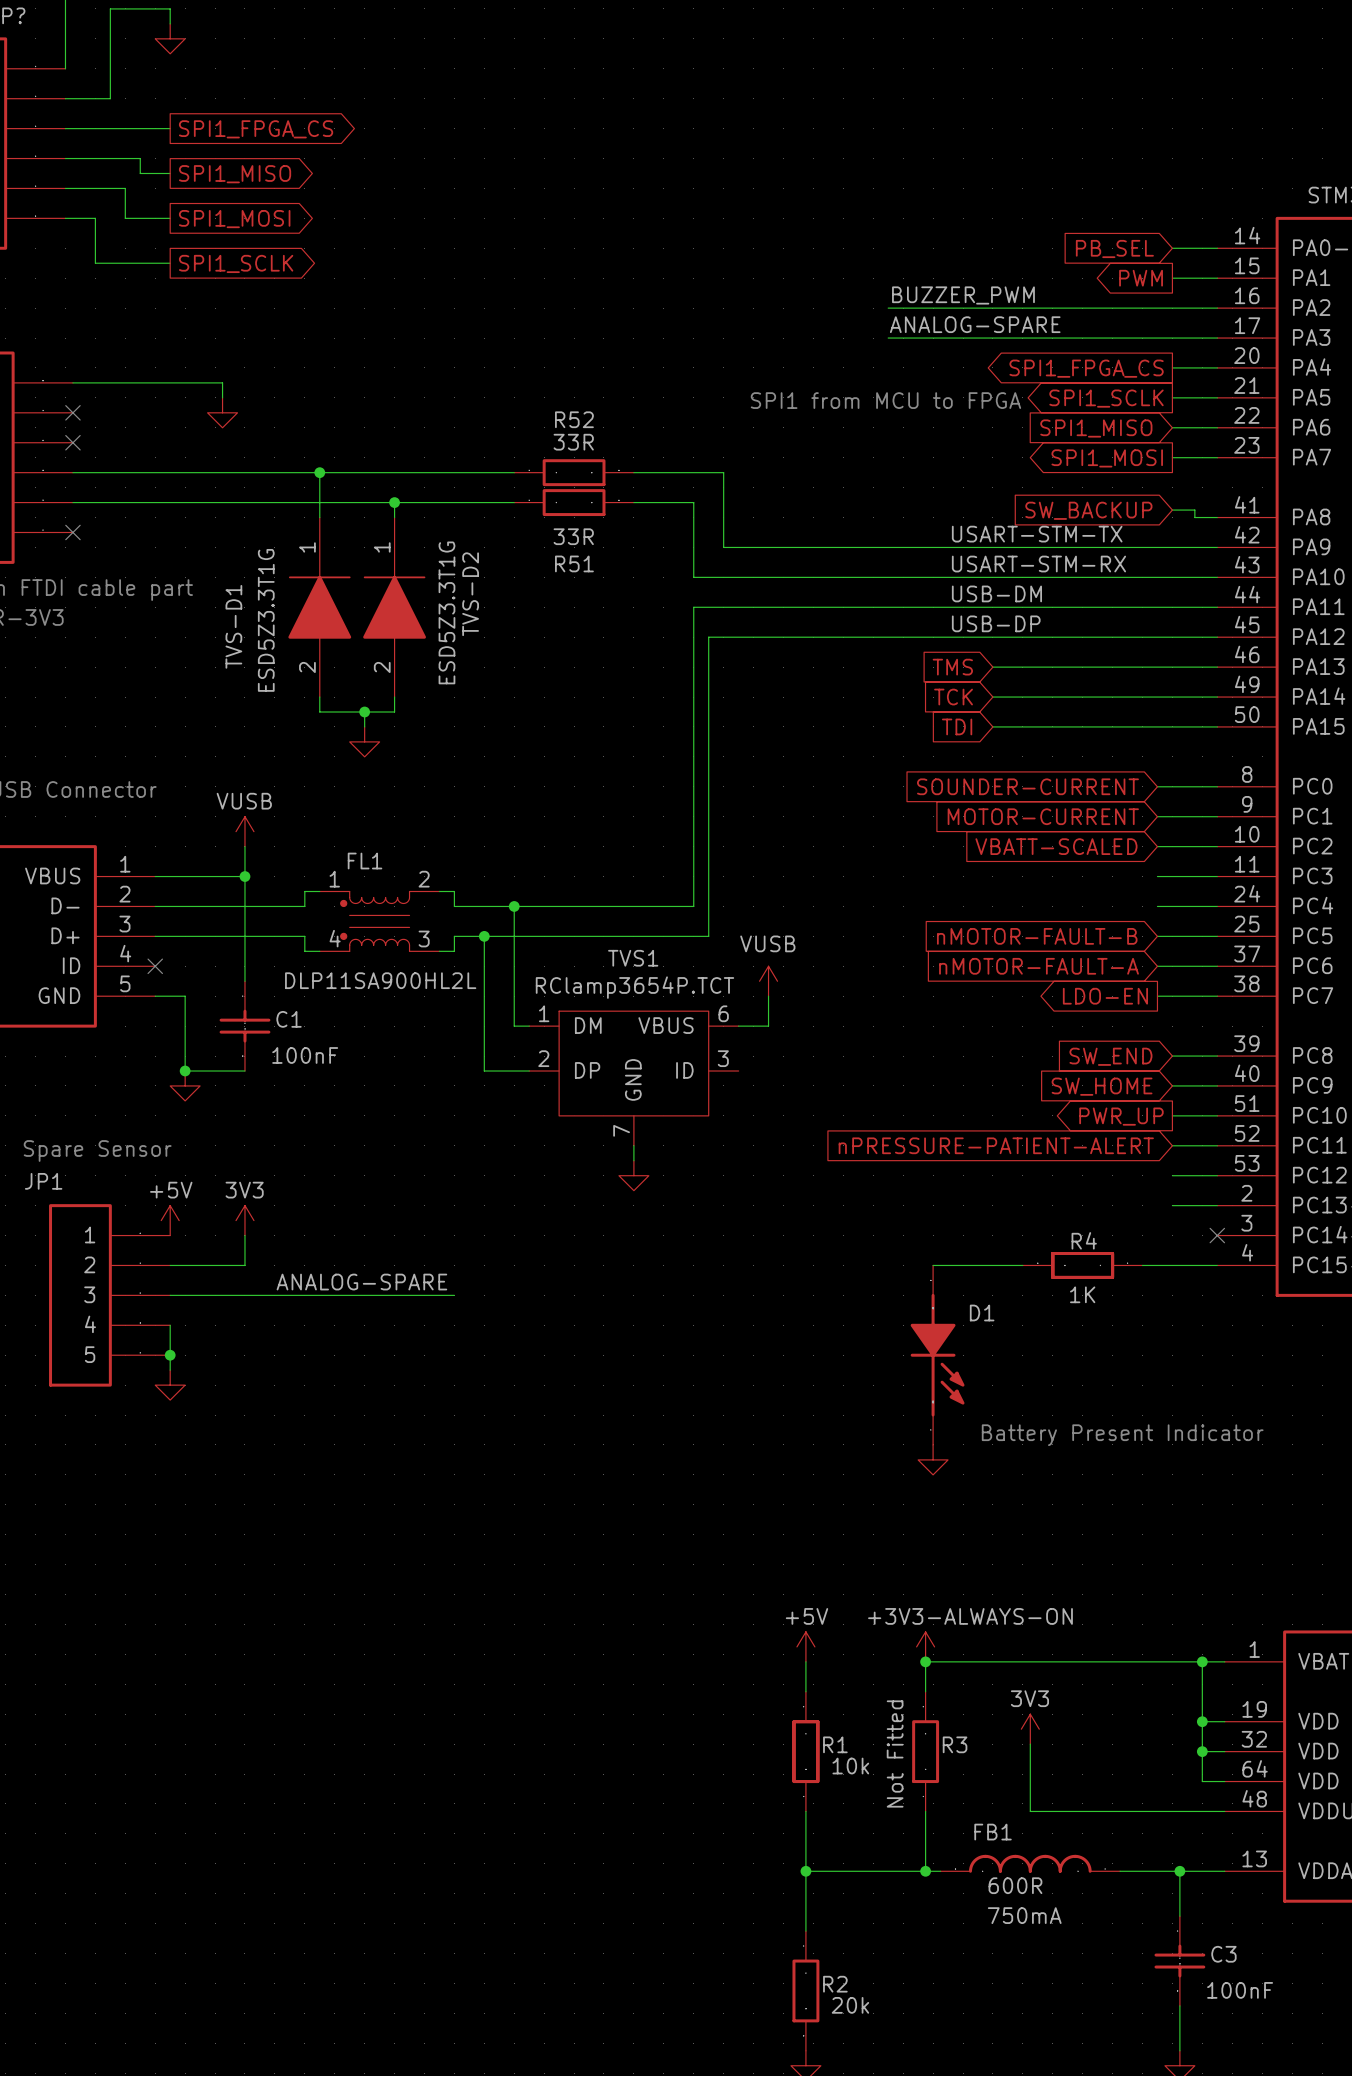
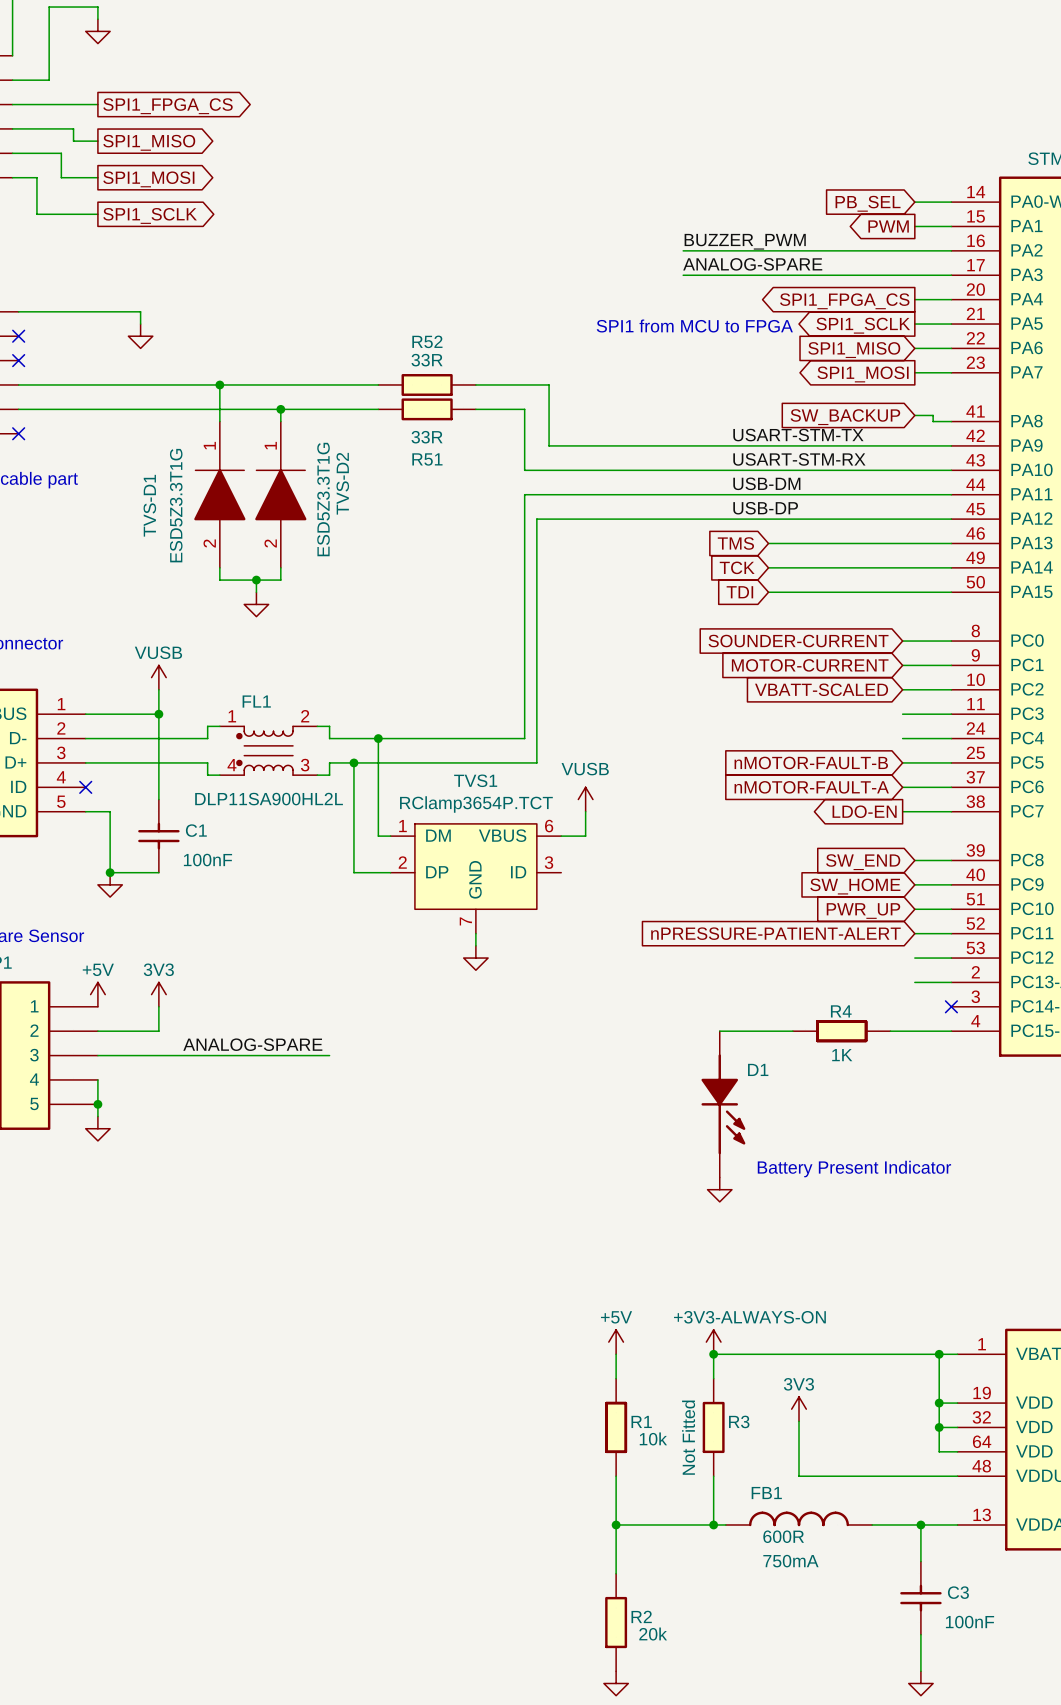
global label shape: output (1121, 1116) -> input (863, 911)

